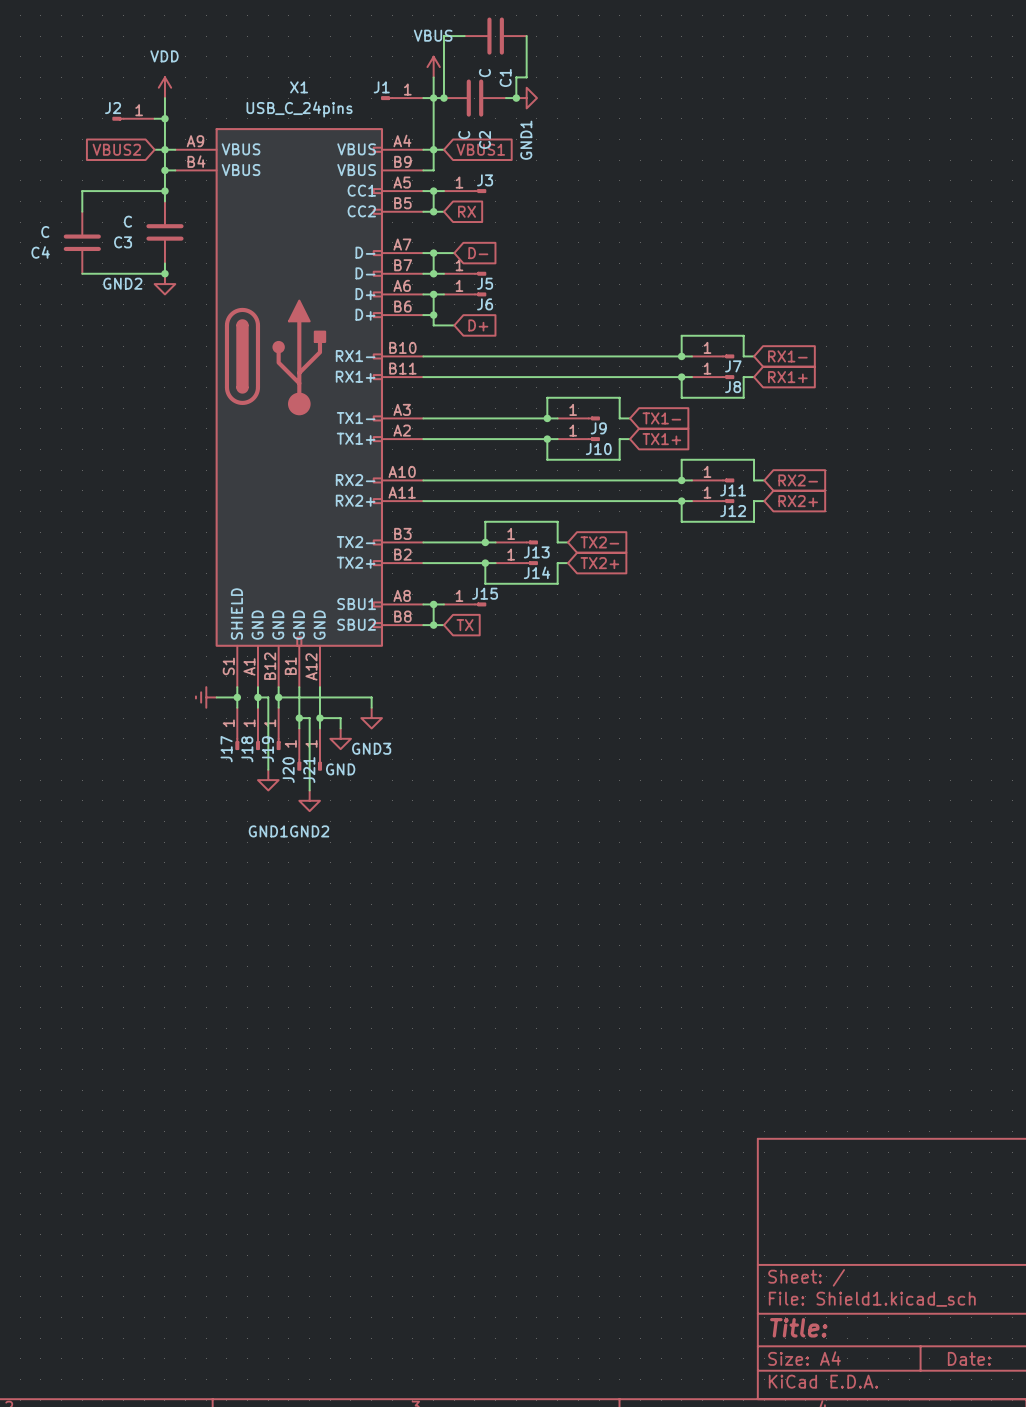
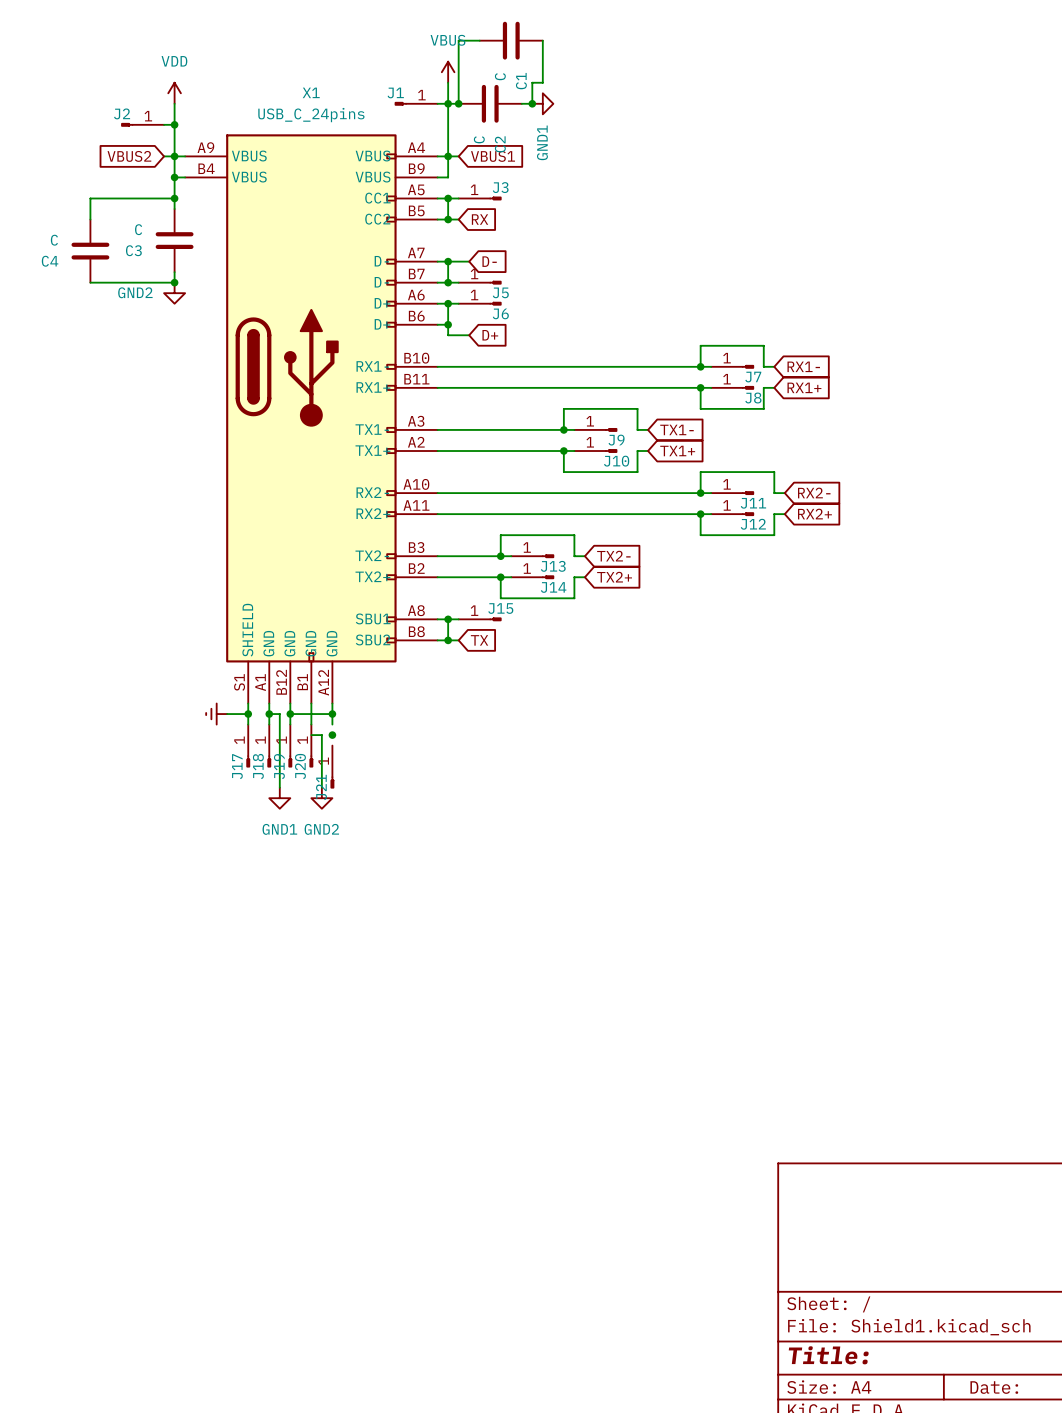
wire: (319, 697) (371, 697) (371, 707) -> none
wire: (319, 707) (319, 728) -> none
junction position: (299, 718) -> (332, 714)
wire: (319, 718) (340, 718) (340, 728) -> none
power symbol: GND3 (371, 718) -> none
power symbol: GND (340, 738) -> none
J20 position: (299, 749) -> (311, 745)
power symbol position: GND2 (309, 800) -> GND2 (321, 798)
power symbol text position: GND1 (268, 831) -> GND1 (279, 829)

